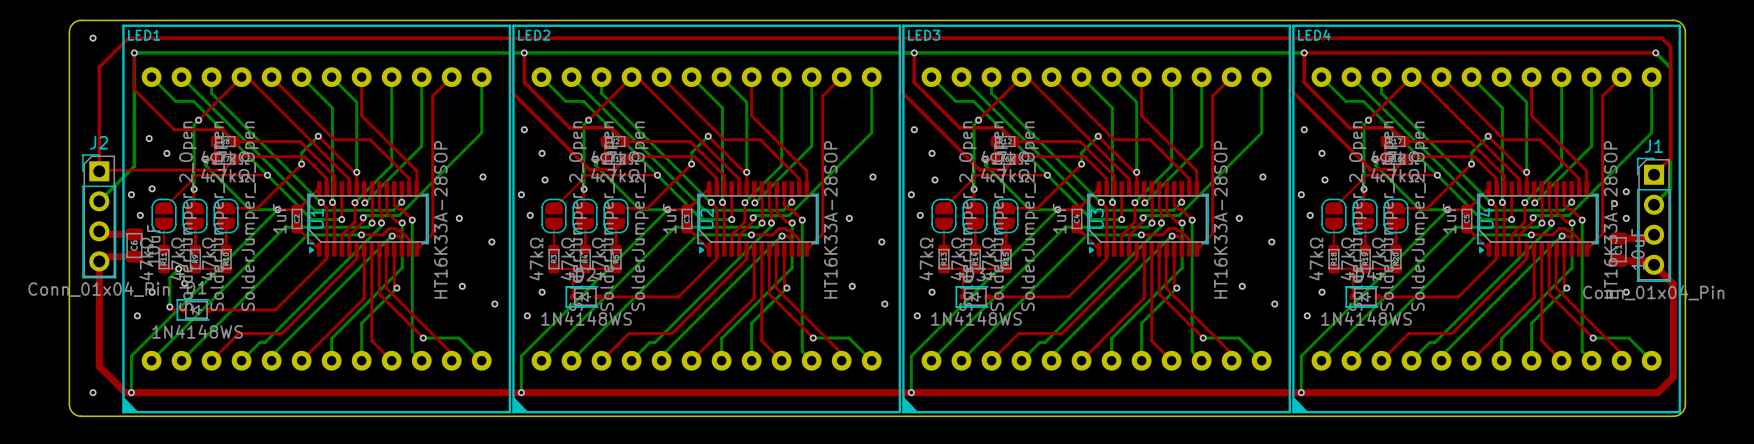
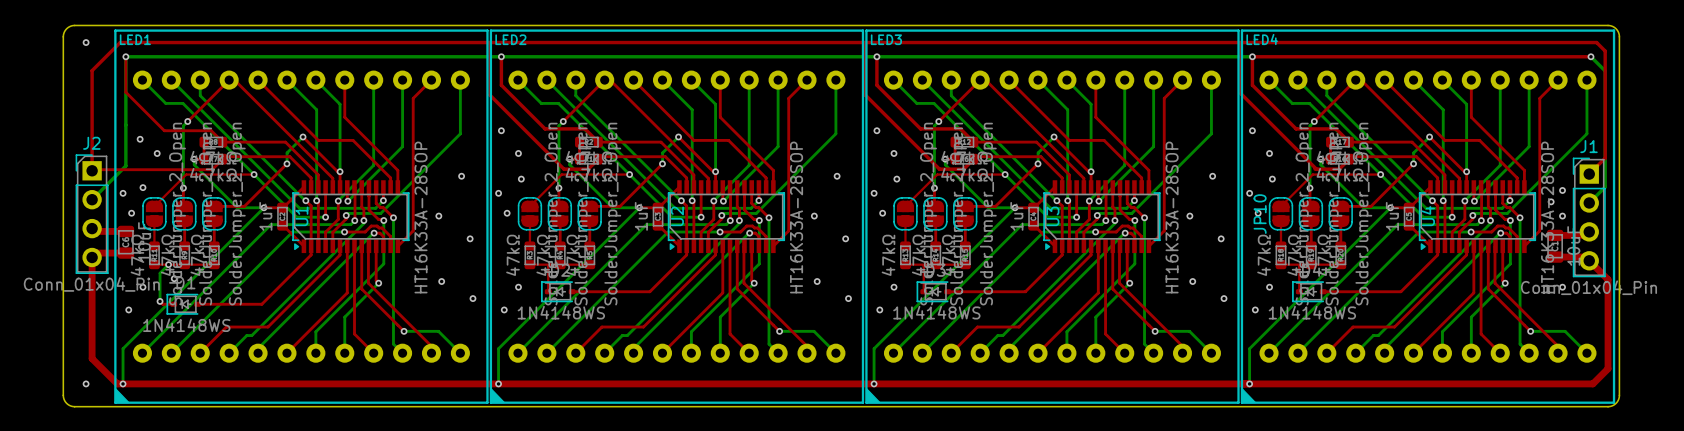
JP10 name: none -> JP10 (1260, 214)

